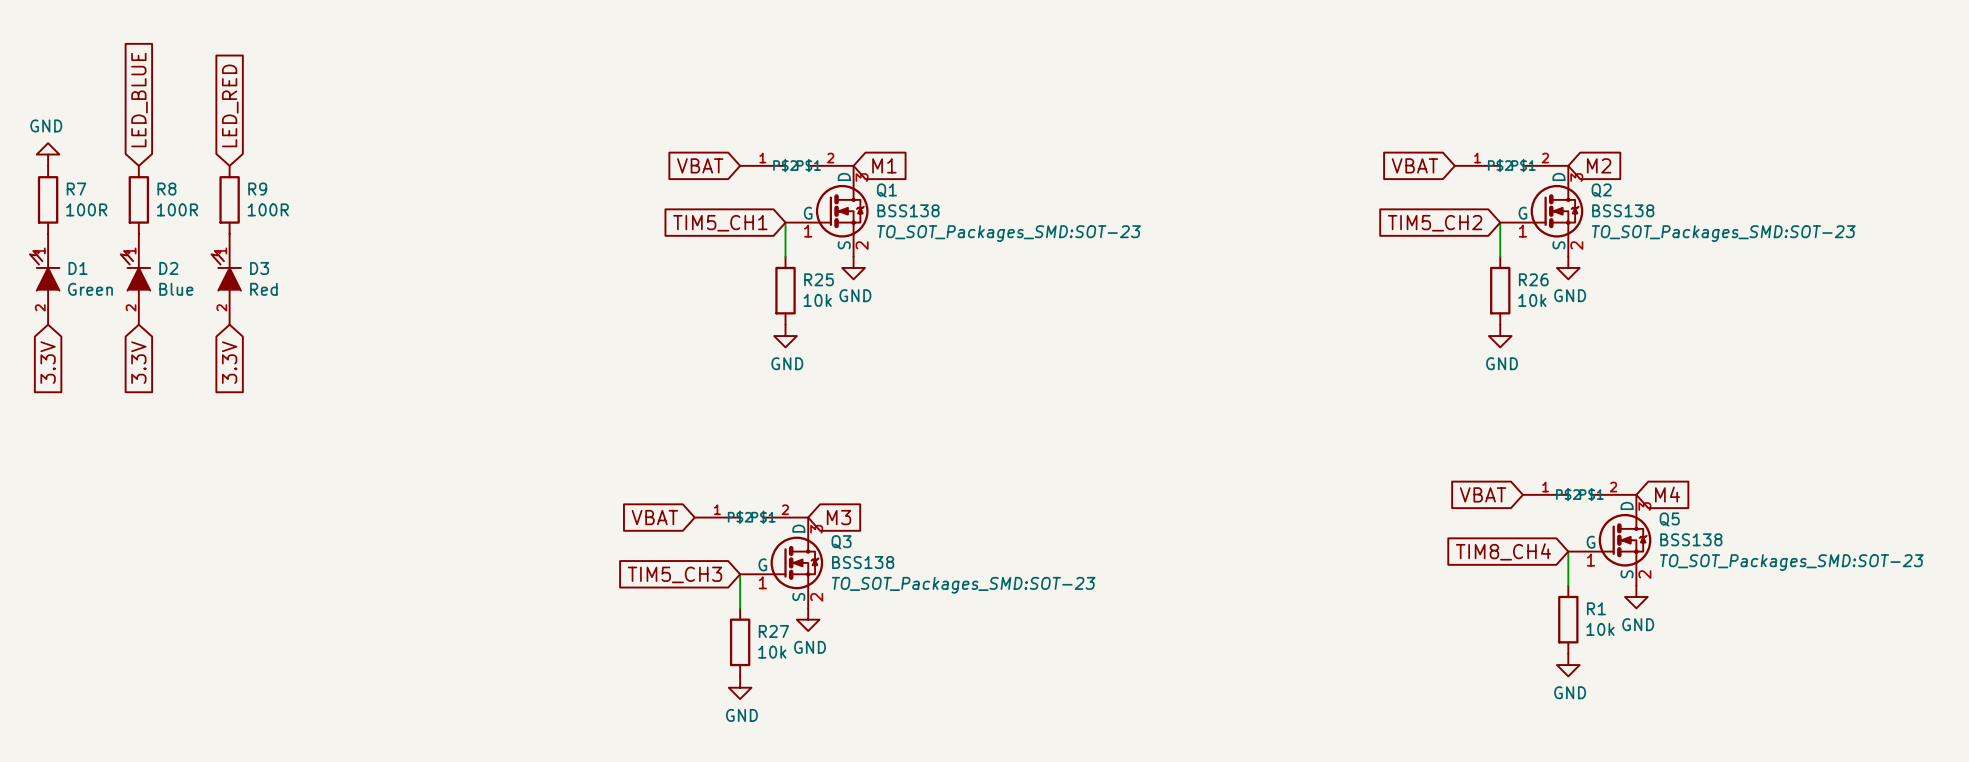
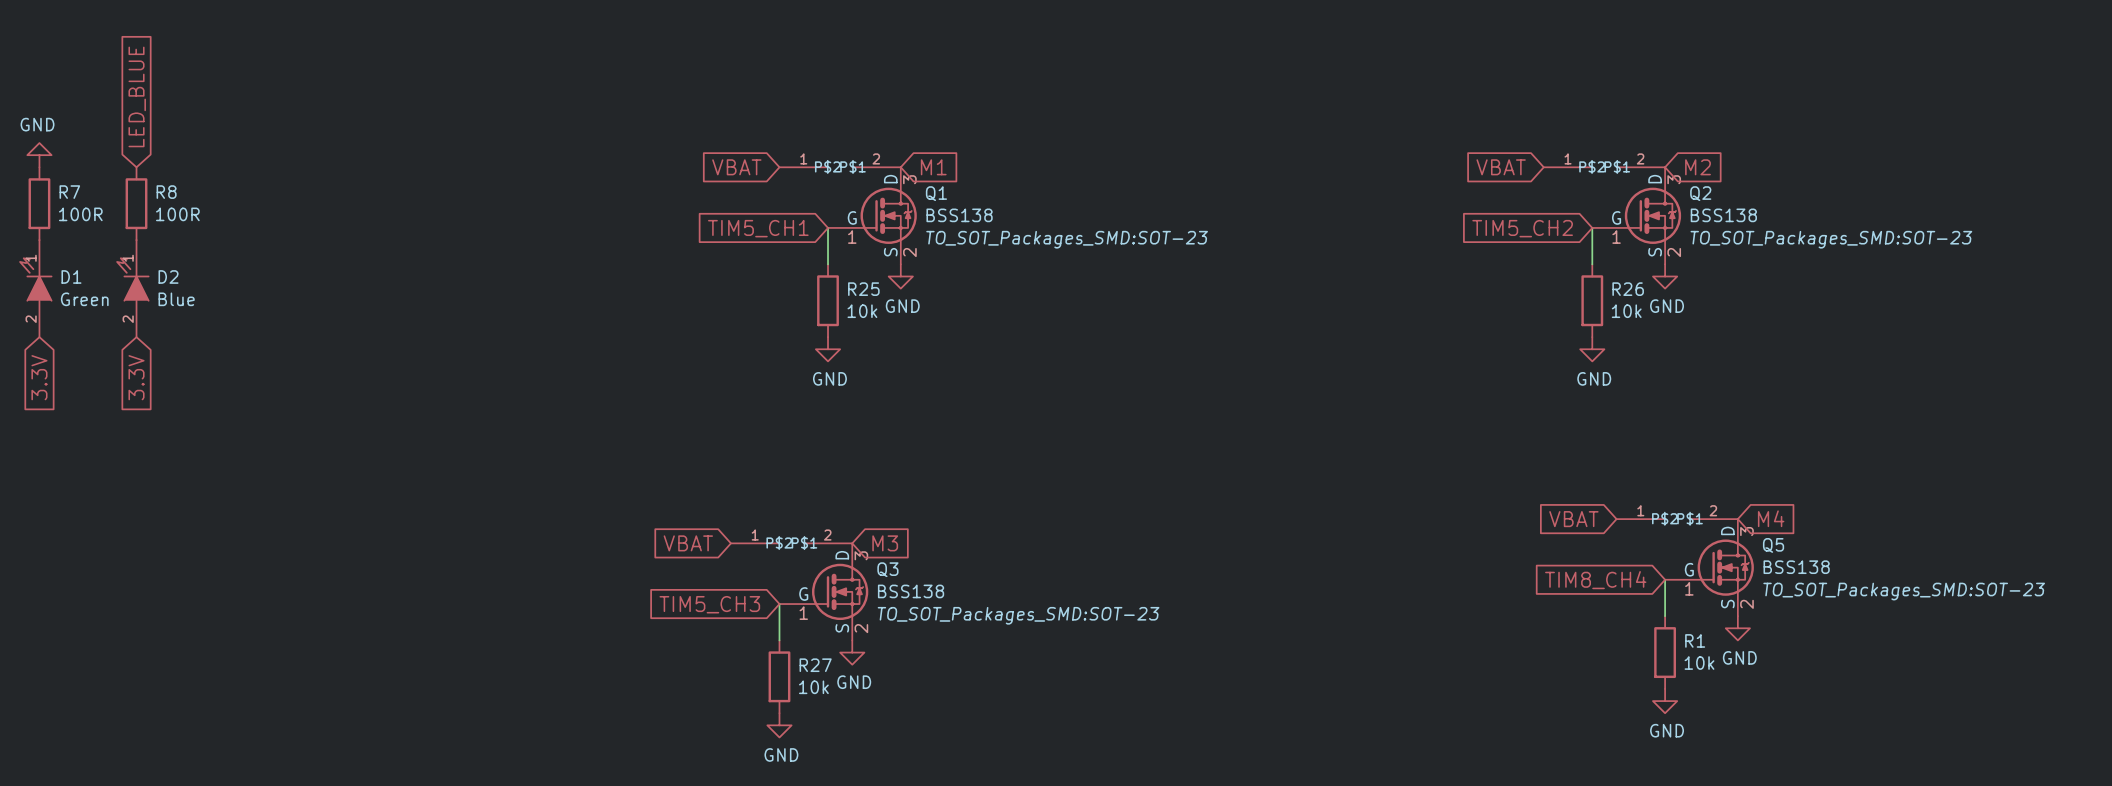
global label: LED_RED (230, 105) -> none
R9: 100R (229, 199) -> none
D3: Red (226, 279) -> none
global label: 3.3V (229, 362) -> none

